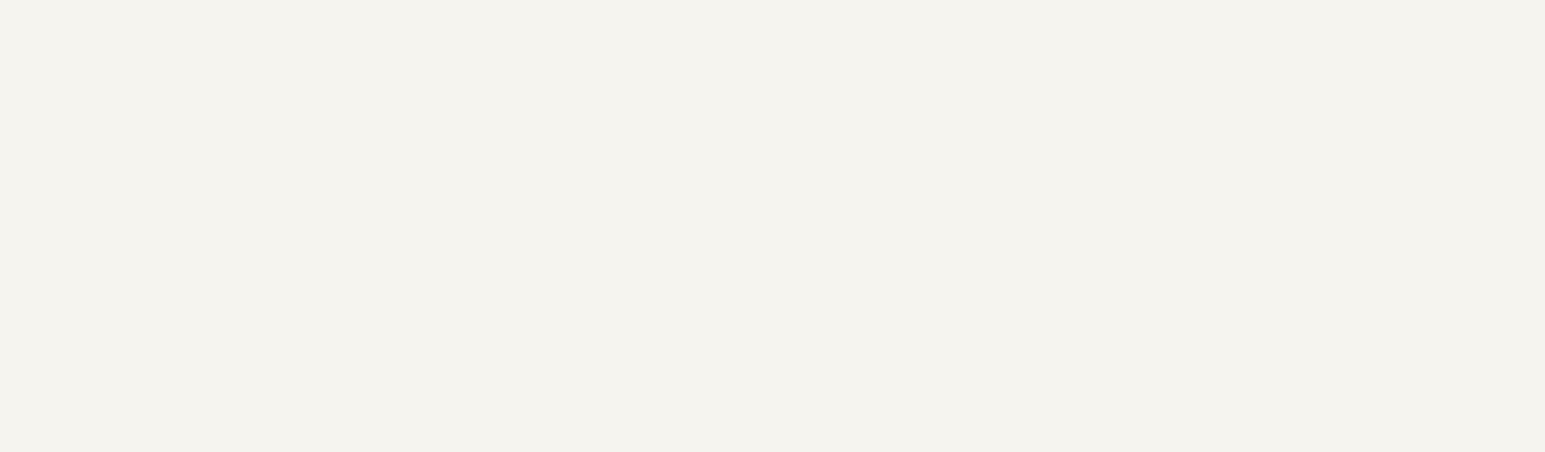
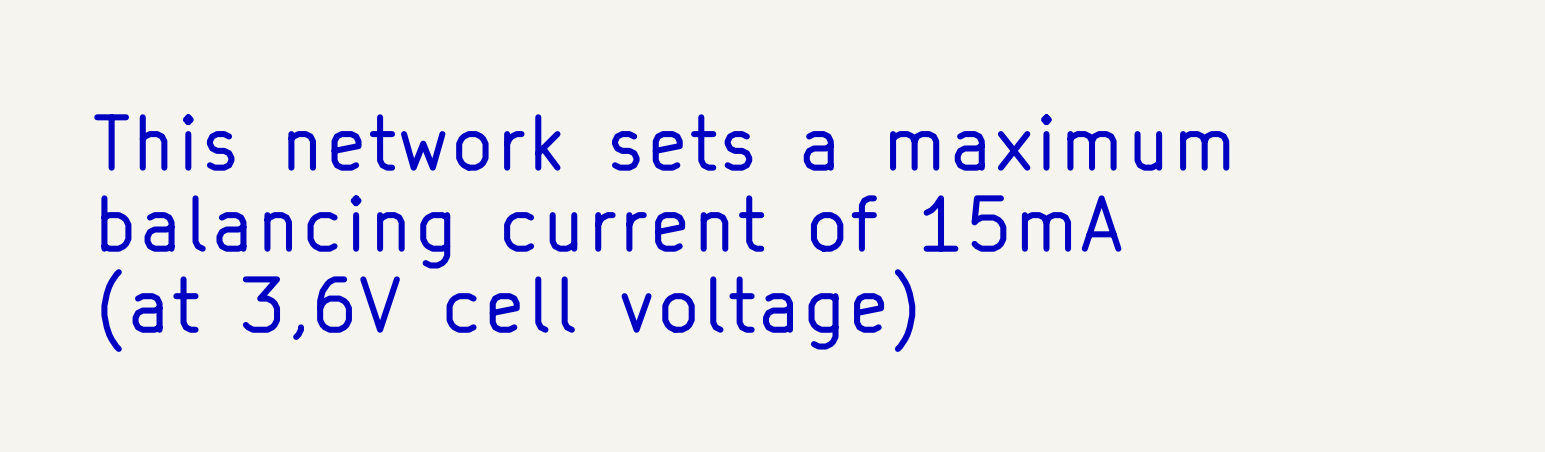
text: none -> This network sets a maximum (661, 142)
text: none -> balancing current of 15mA (611, 231)
text: none -> (at 3,6V cell voltage) (508, 310)

